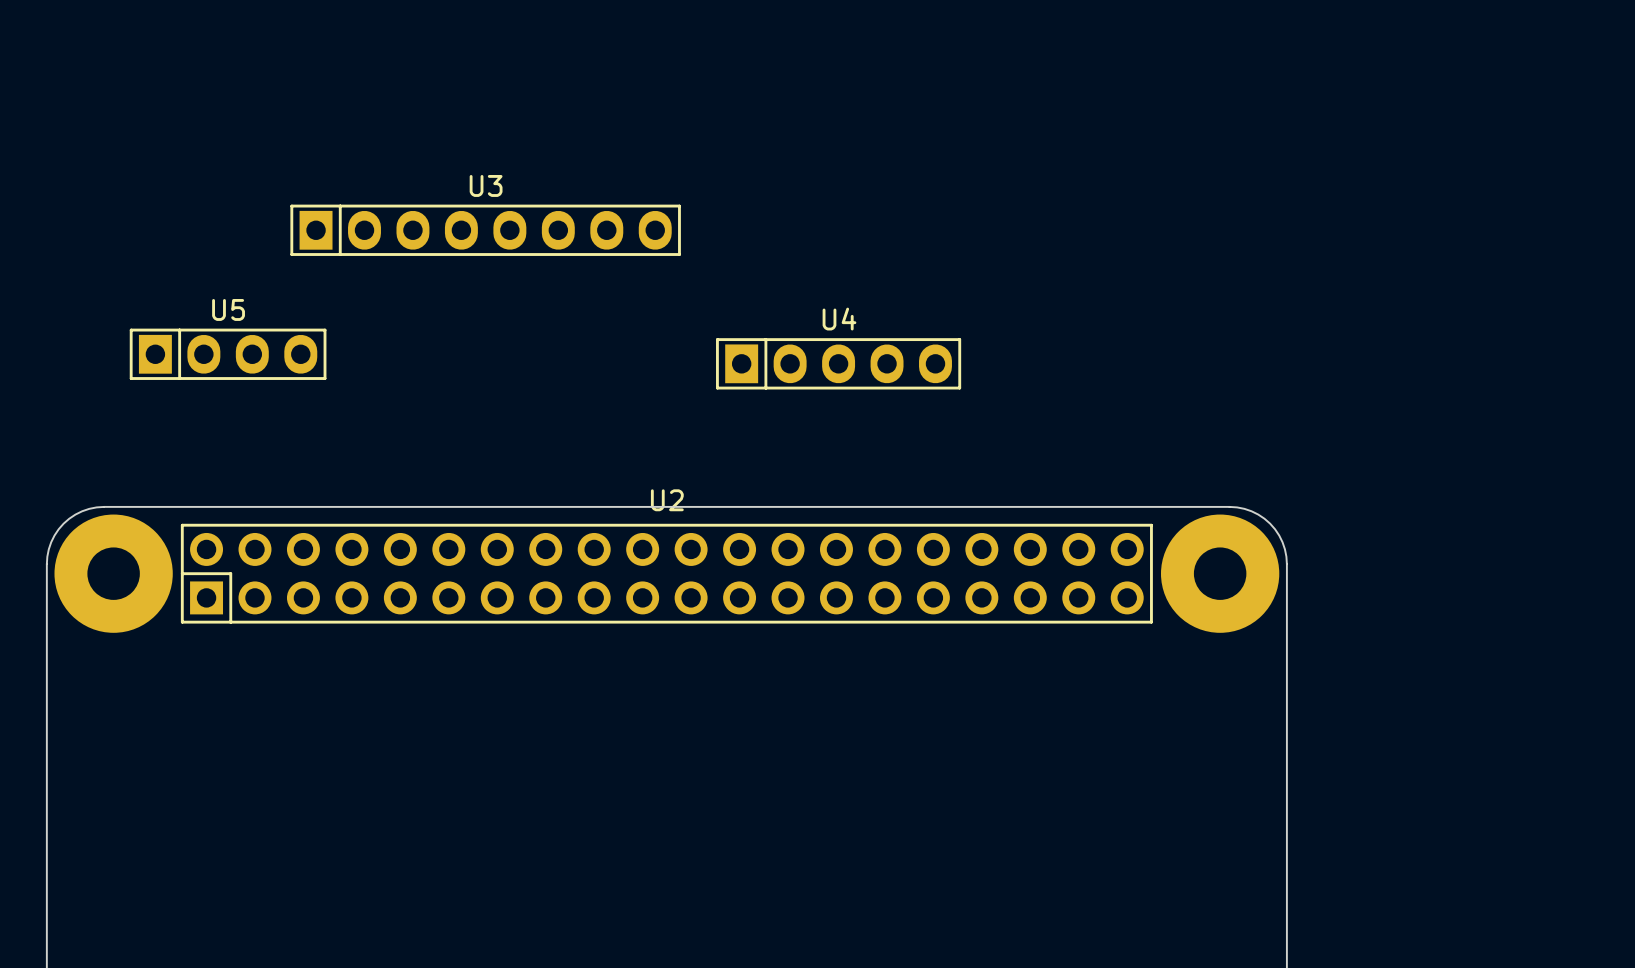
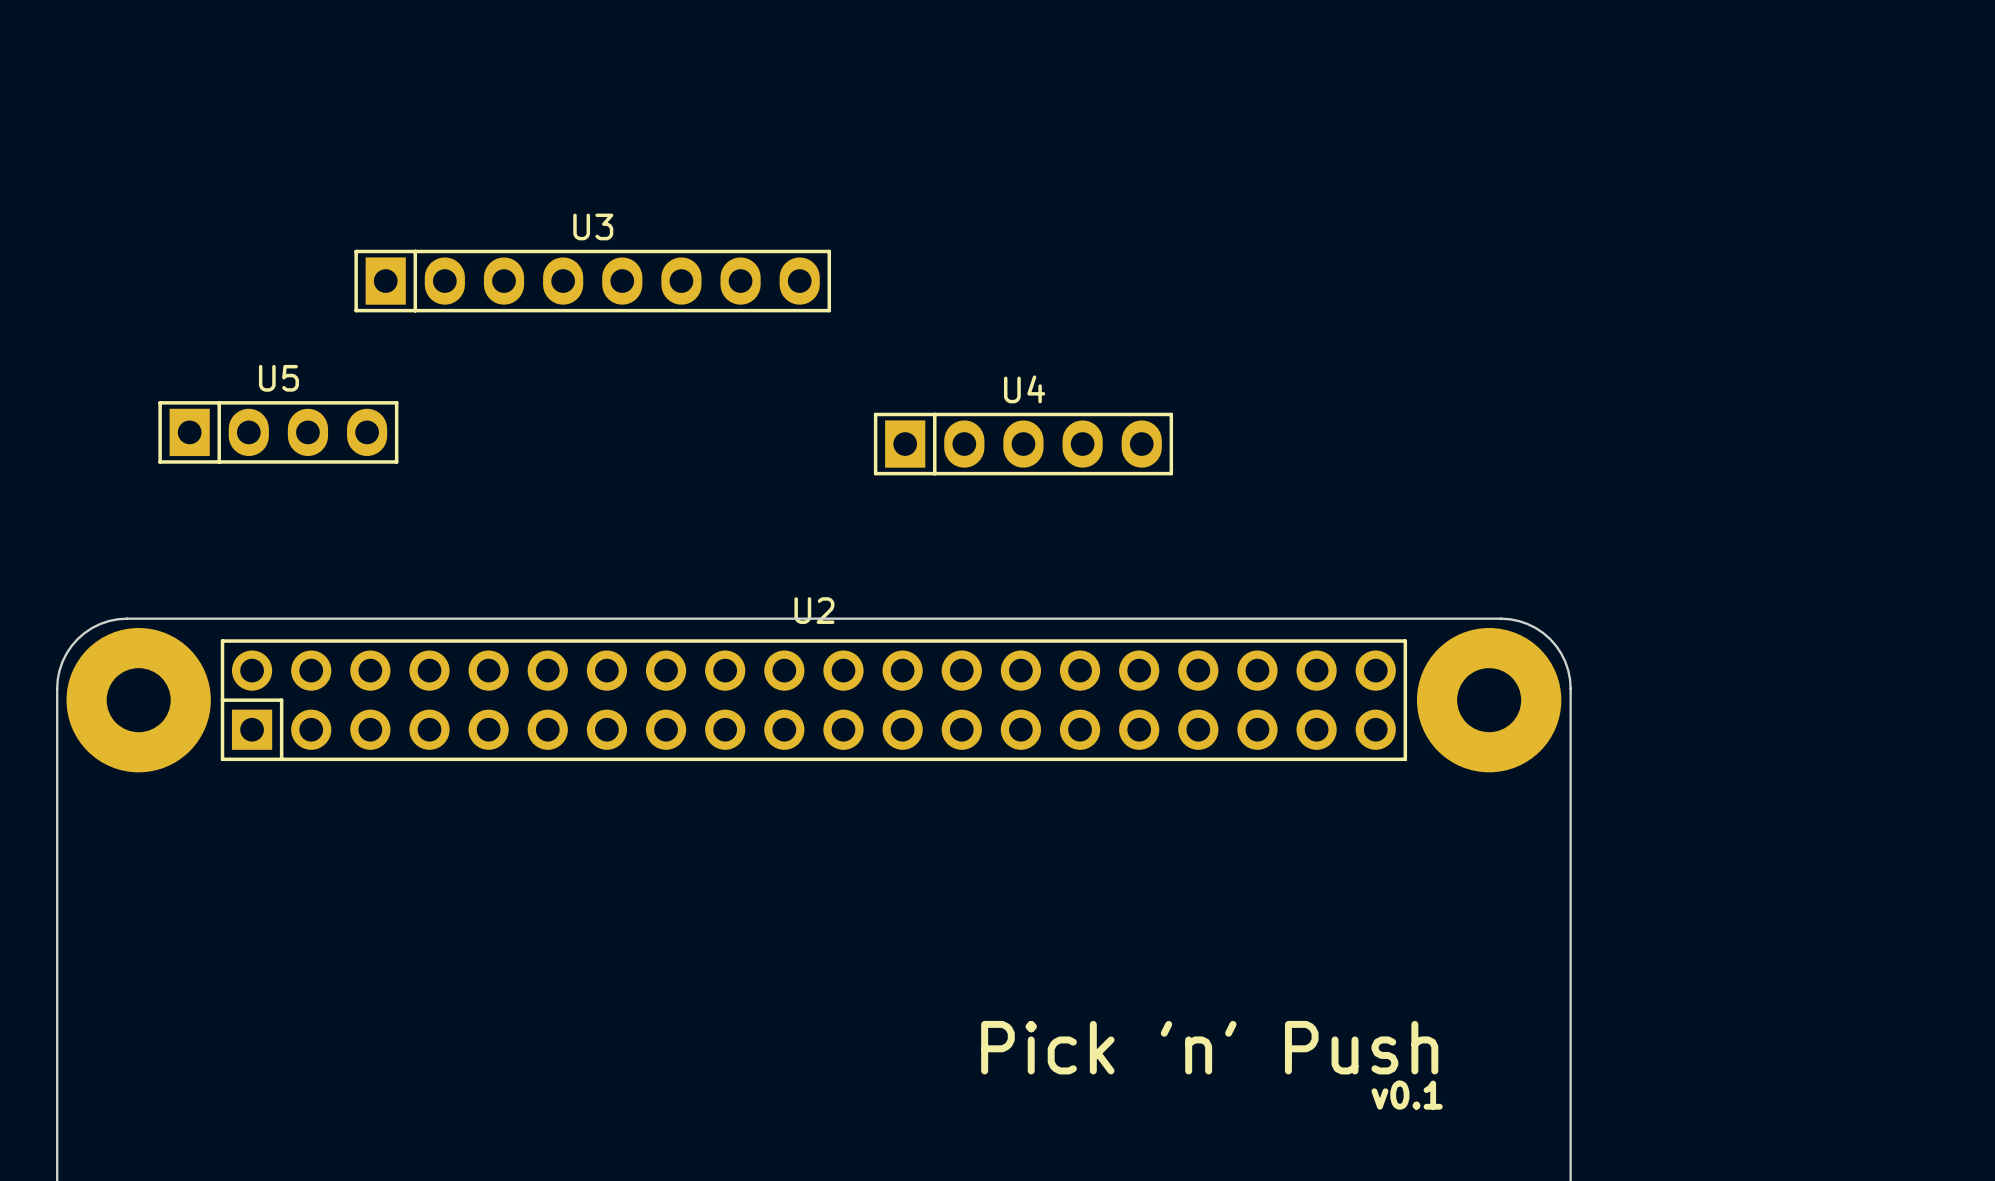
text: none -> Pick 'n' Push (1209, 1047)
text: none -> v0.1 (1407, 1095)

